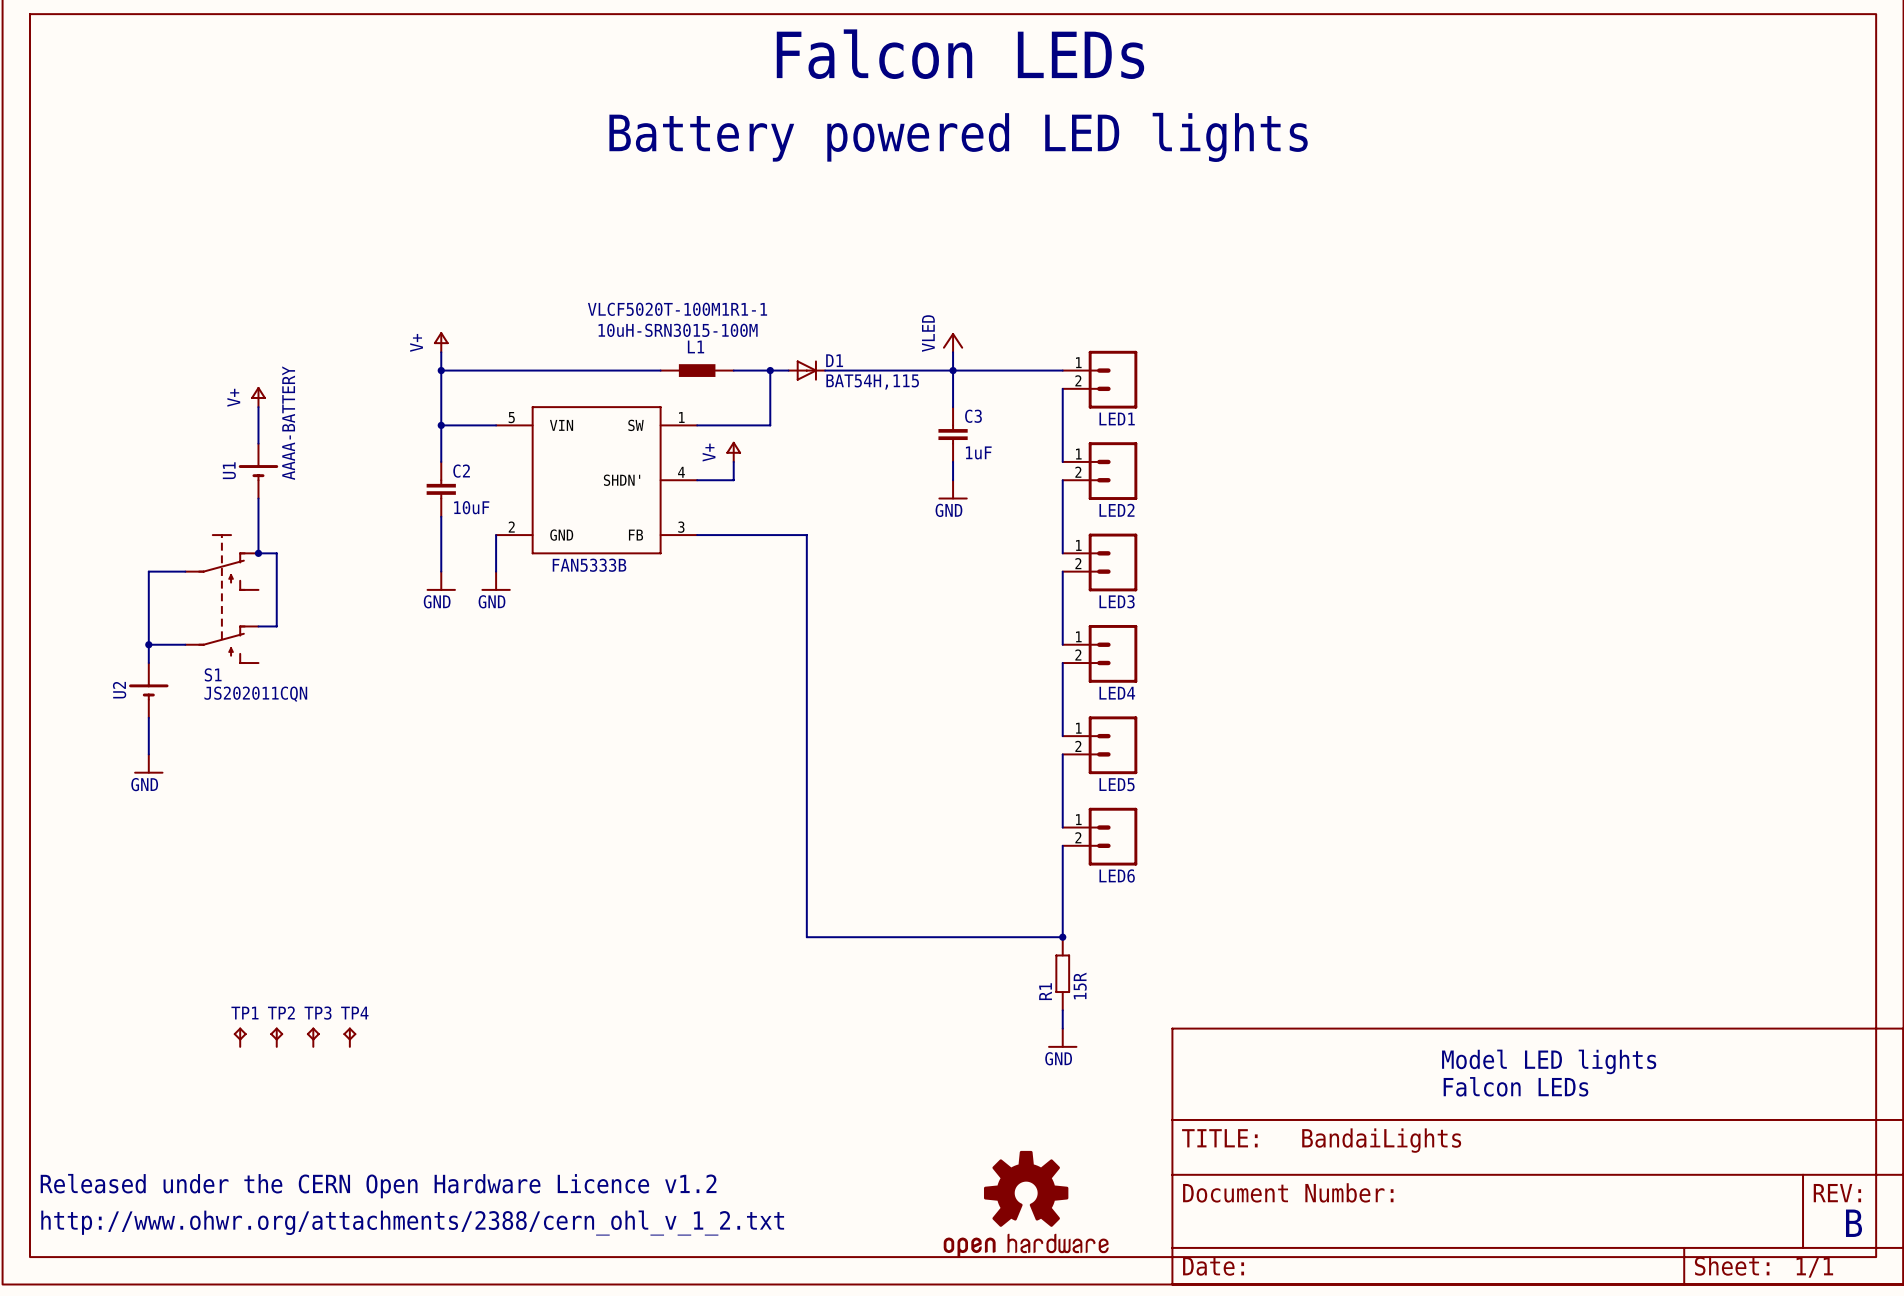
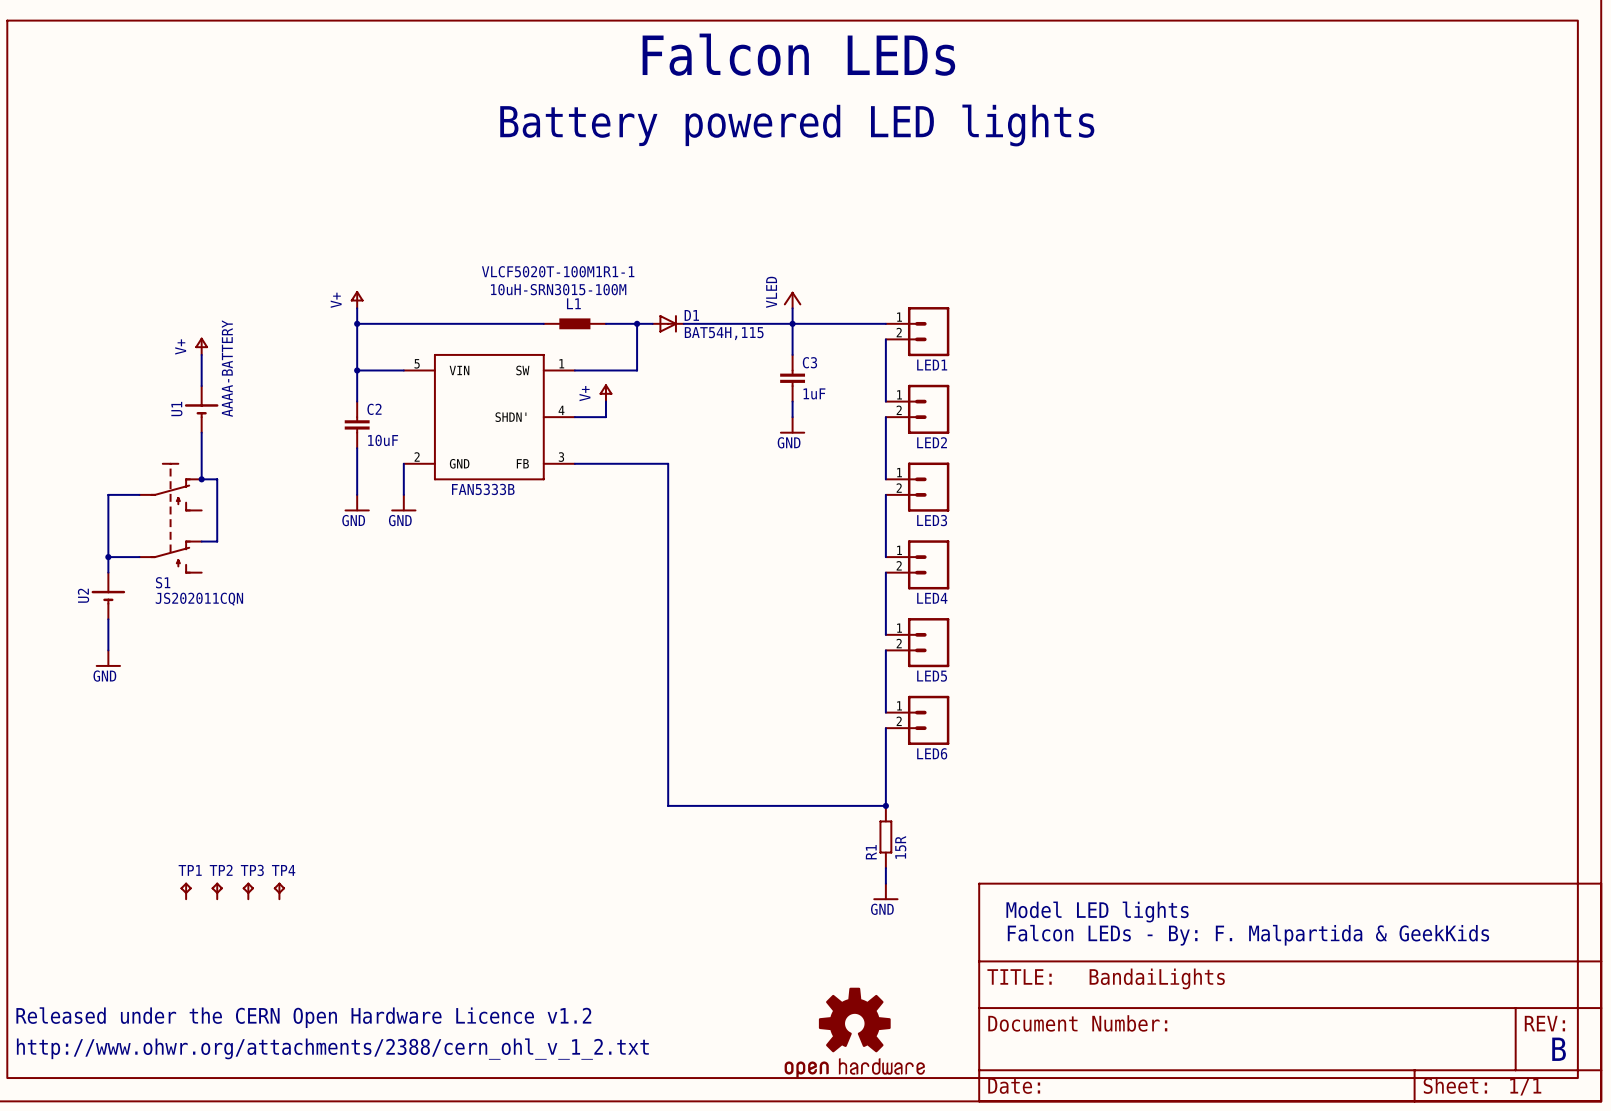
text: none -> Model LED lights (1097, 911)
text: Model LED lights (1549, 1061) -> none
text: Falcon LEDs (1515, 1086) -> none
text: none -> Falcon LEDs - By: F. Malpartida & GeekKids (1248, 935)

